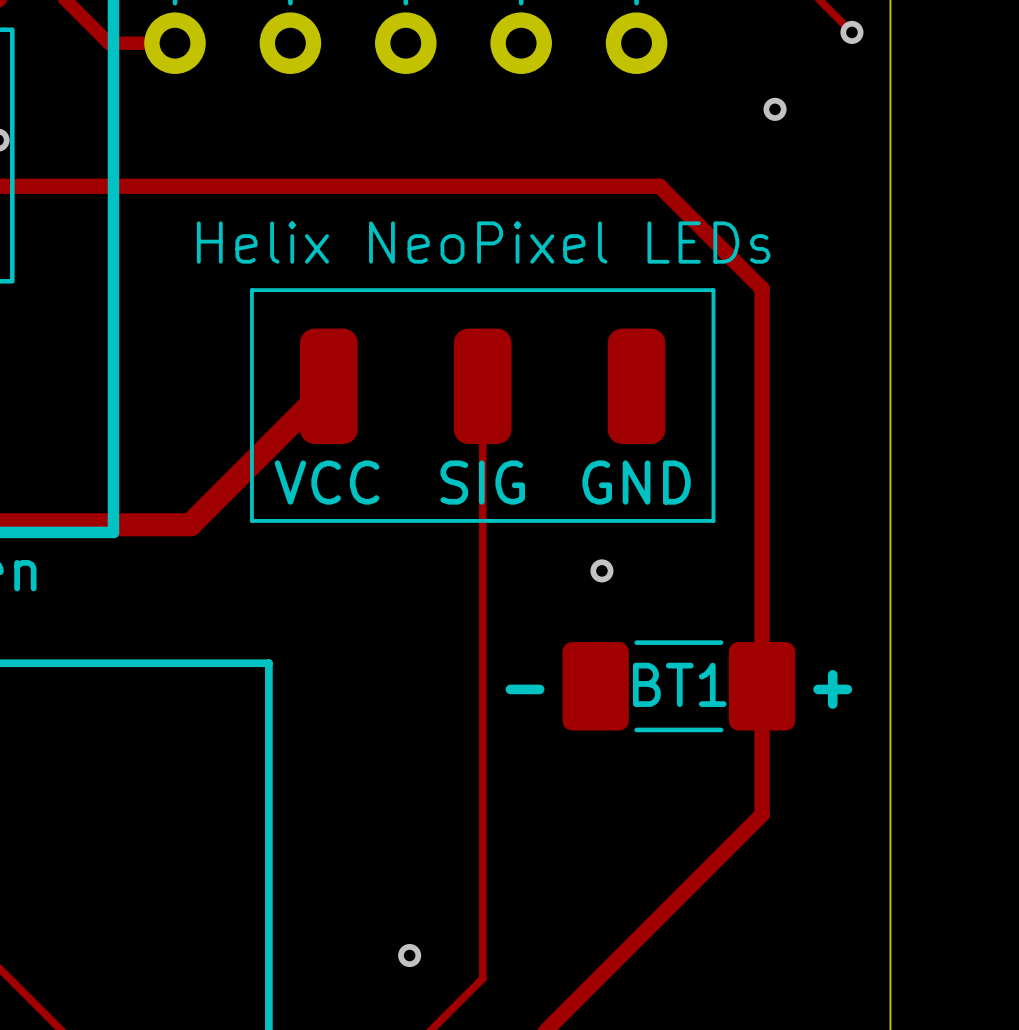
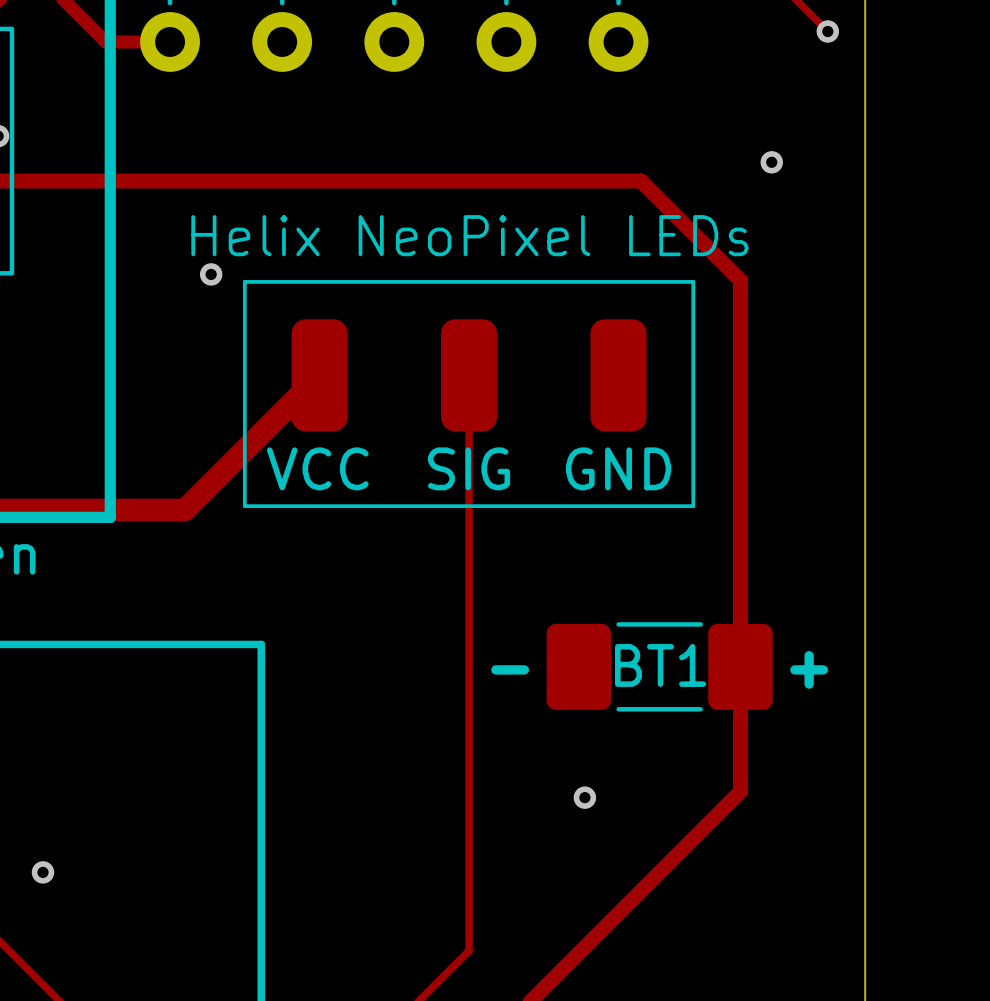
via position: (775, 109) -> (771, 162)
via: none -> (211, 274)
via: (601, 570) -> none
via: none -> (584, 797)
via: none -> (42, 872)
via: (409, 955) -> none

